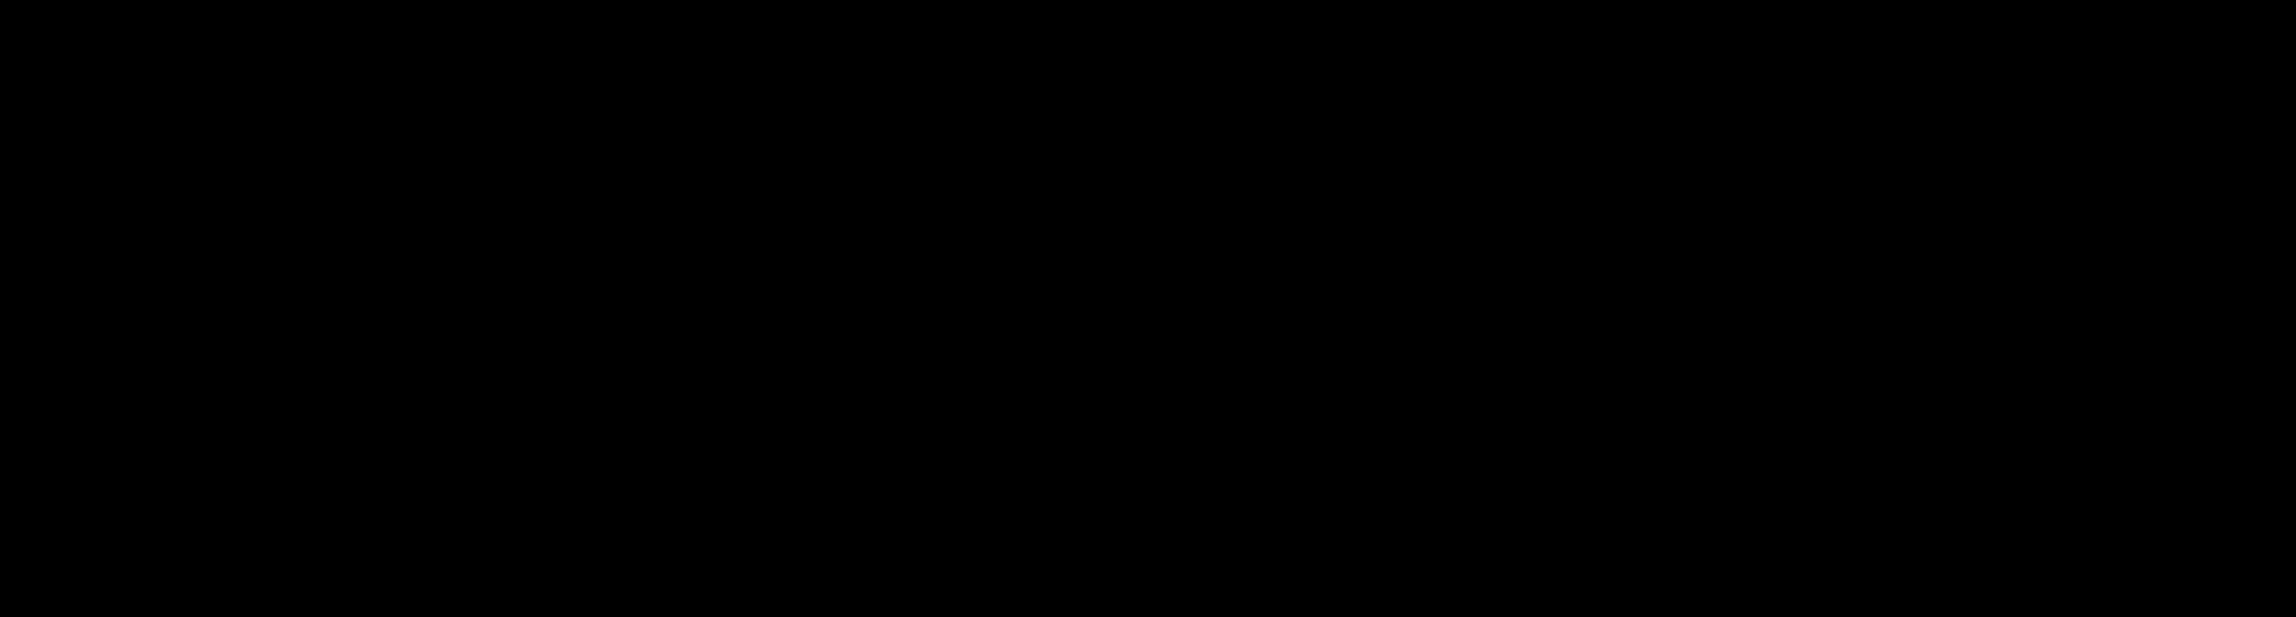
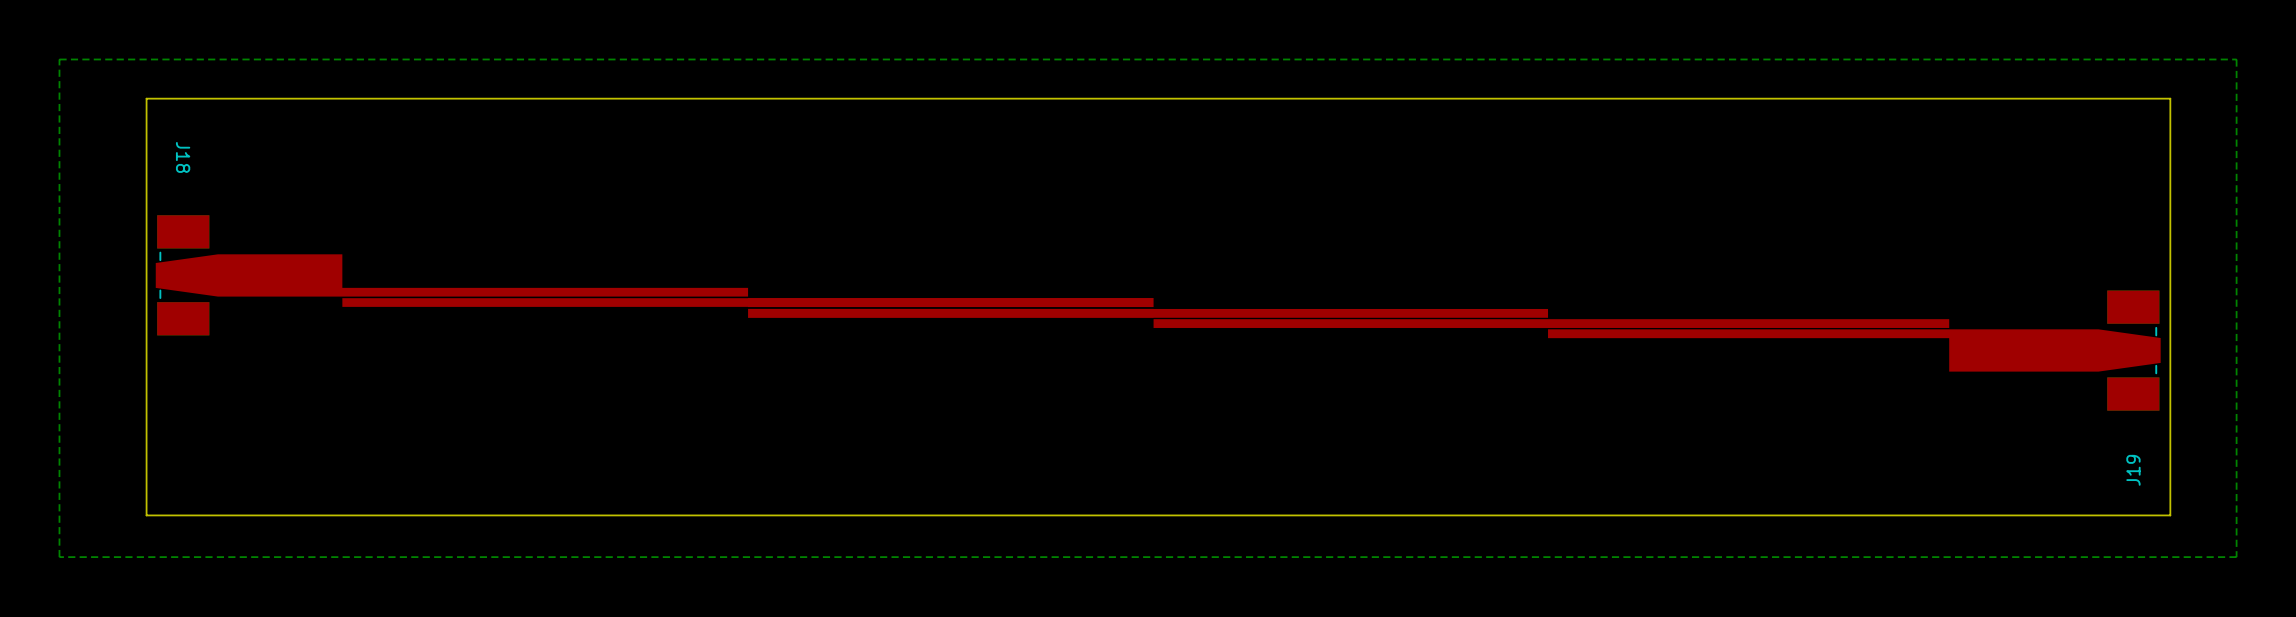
bottom zone outline: none -> (59, 59) (2236, 59) (2236, 557) (59, 557) (59, 59)
board edge: none -> (146, 98) (2170, 98) (2170, 515) (146, 515) (146, 98)
drawing: none -> [155, 254, 2161, 372]
J18: none -> (183, 275)
J19: none -> (2133, 350)

